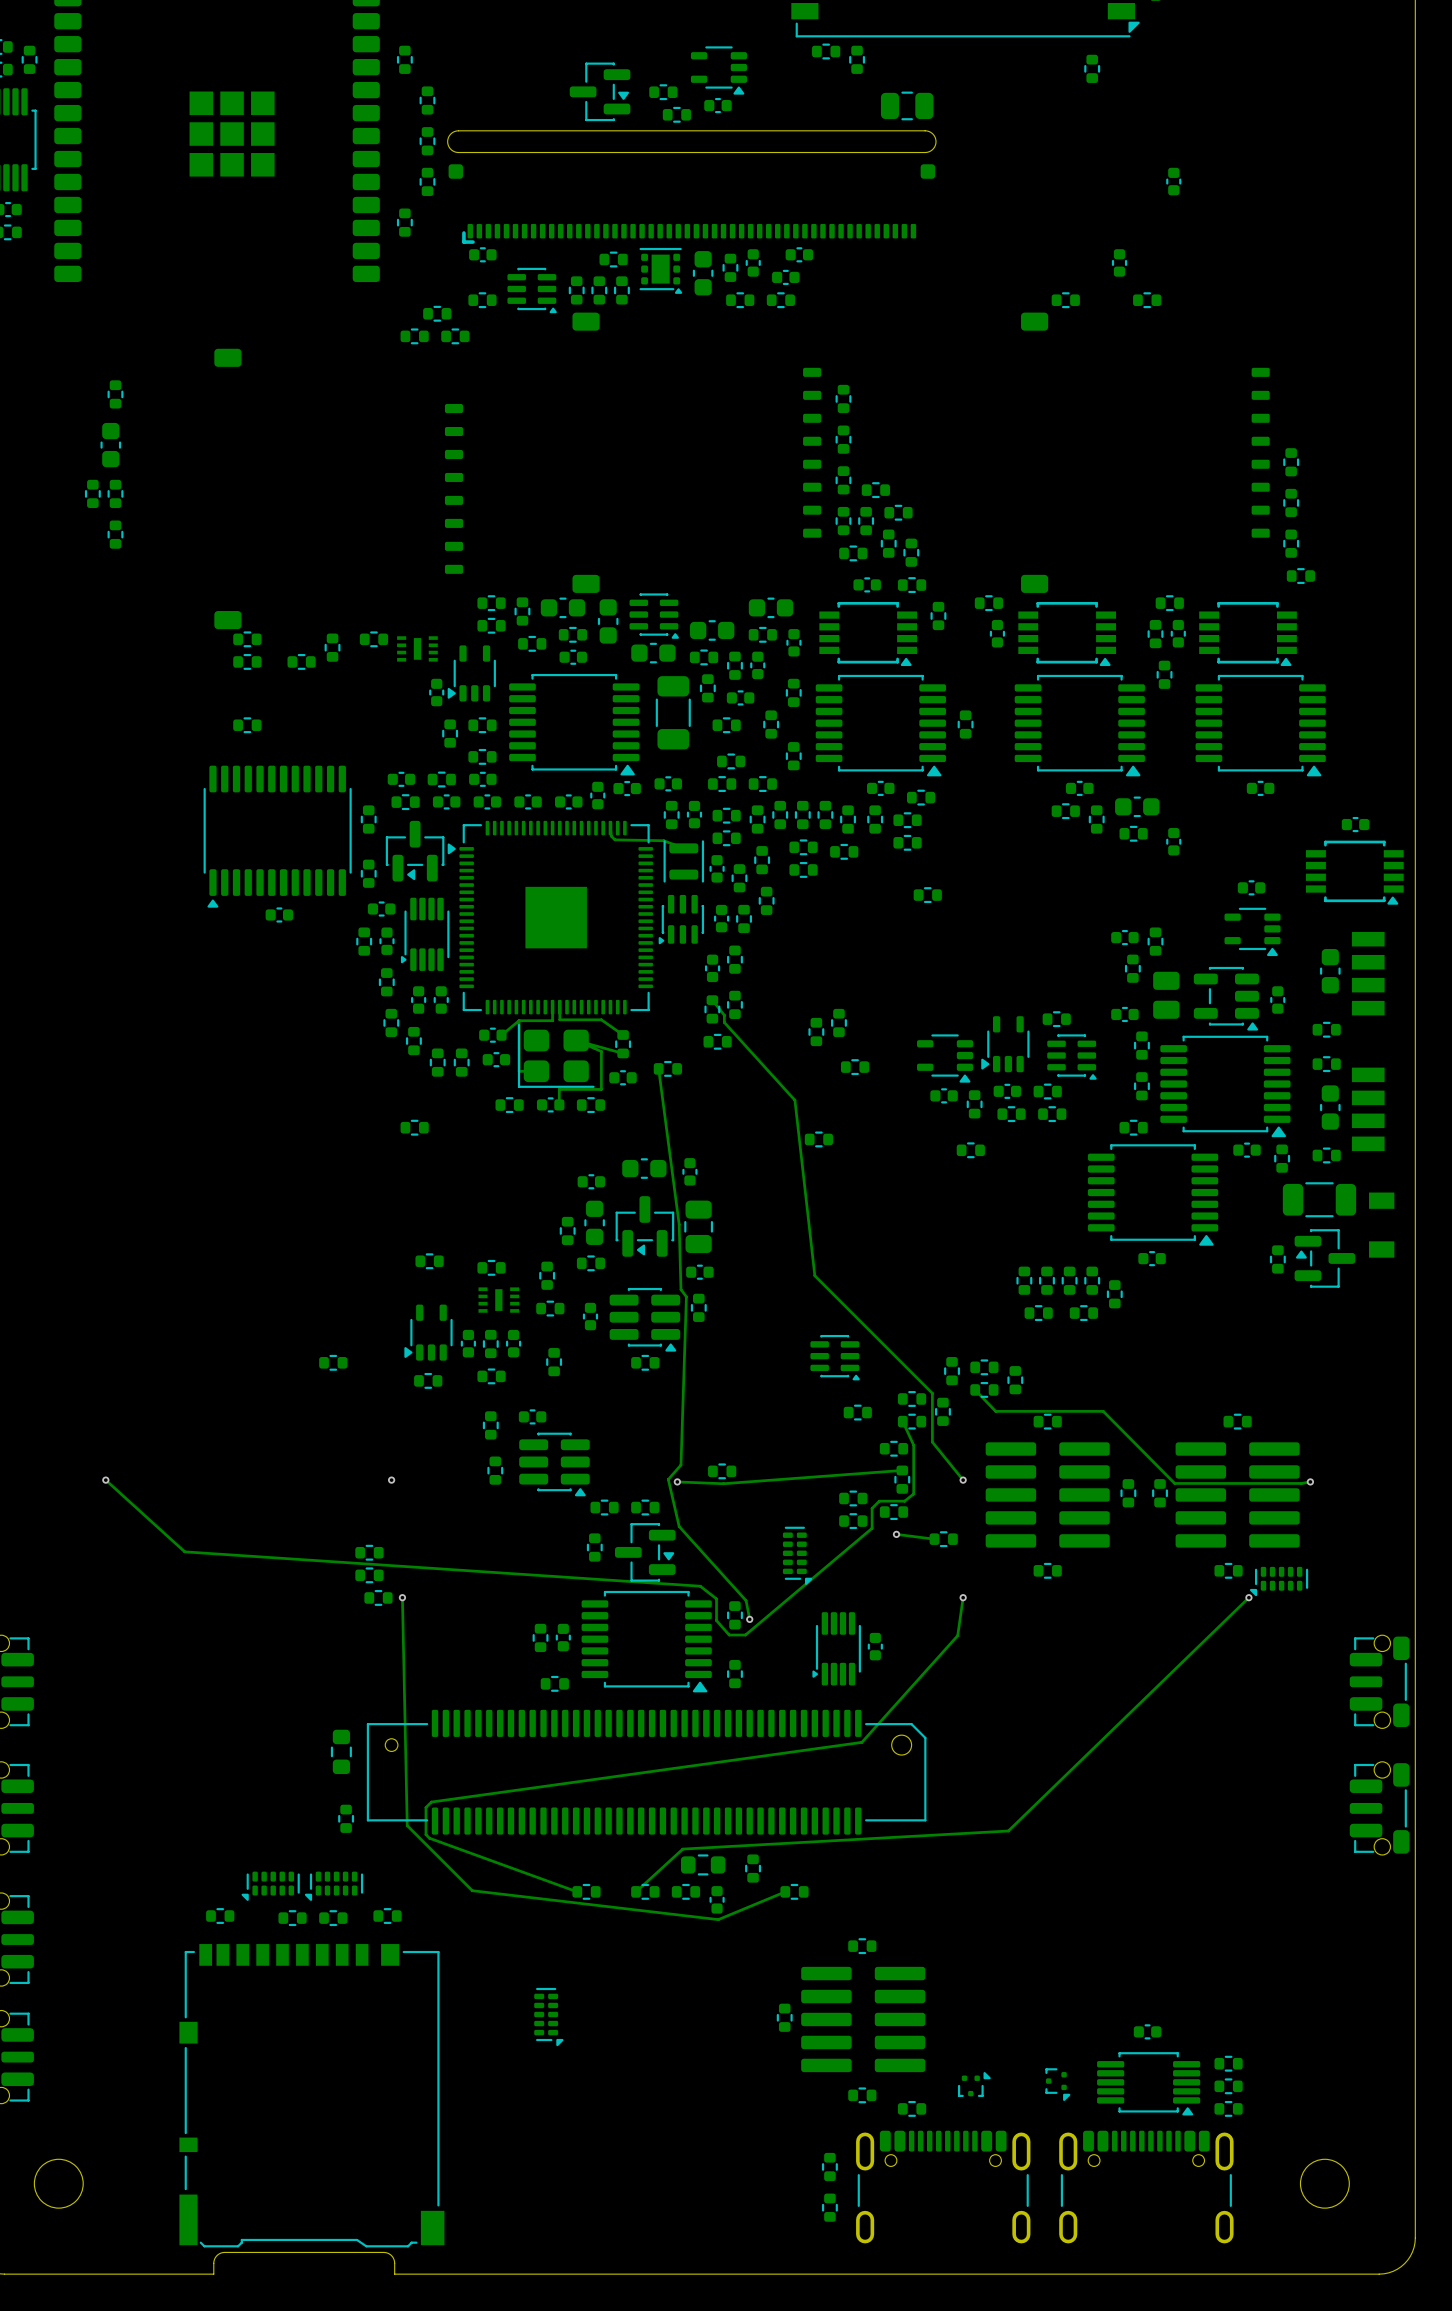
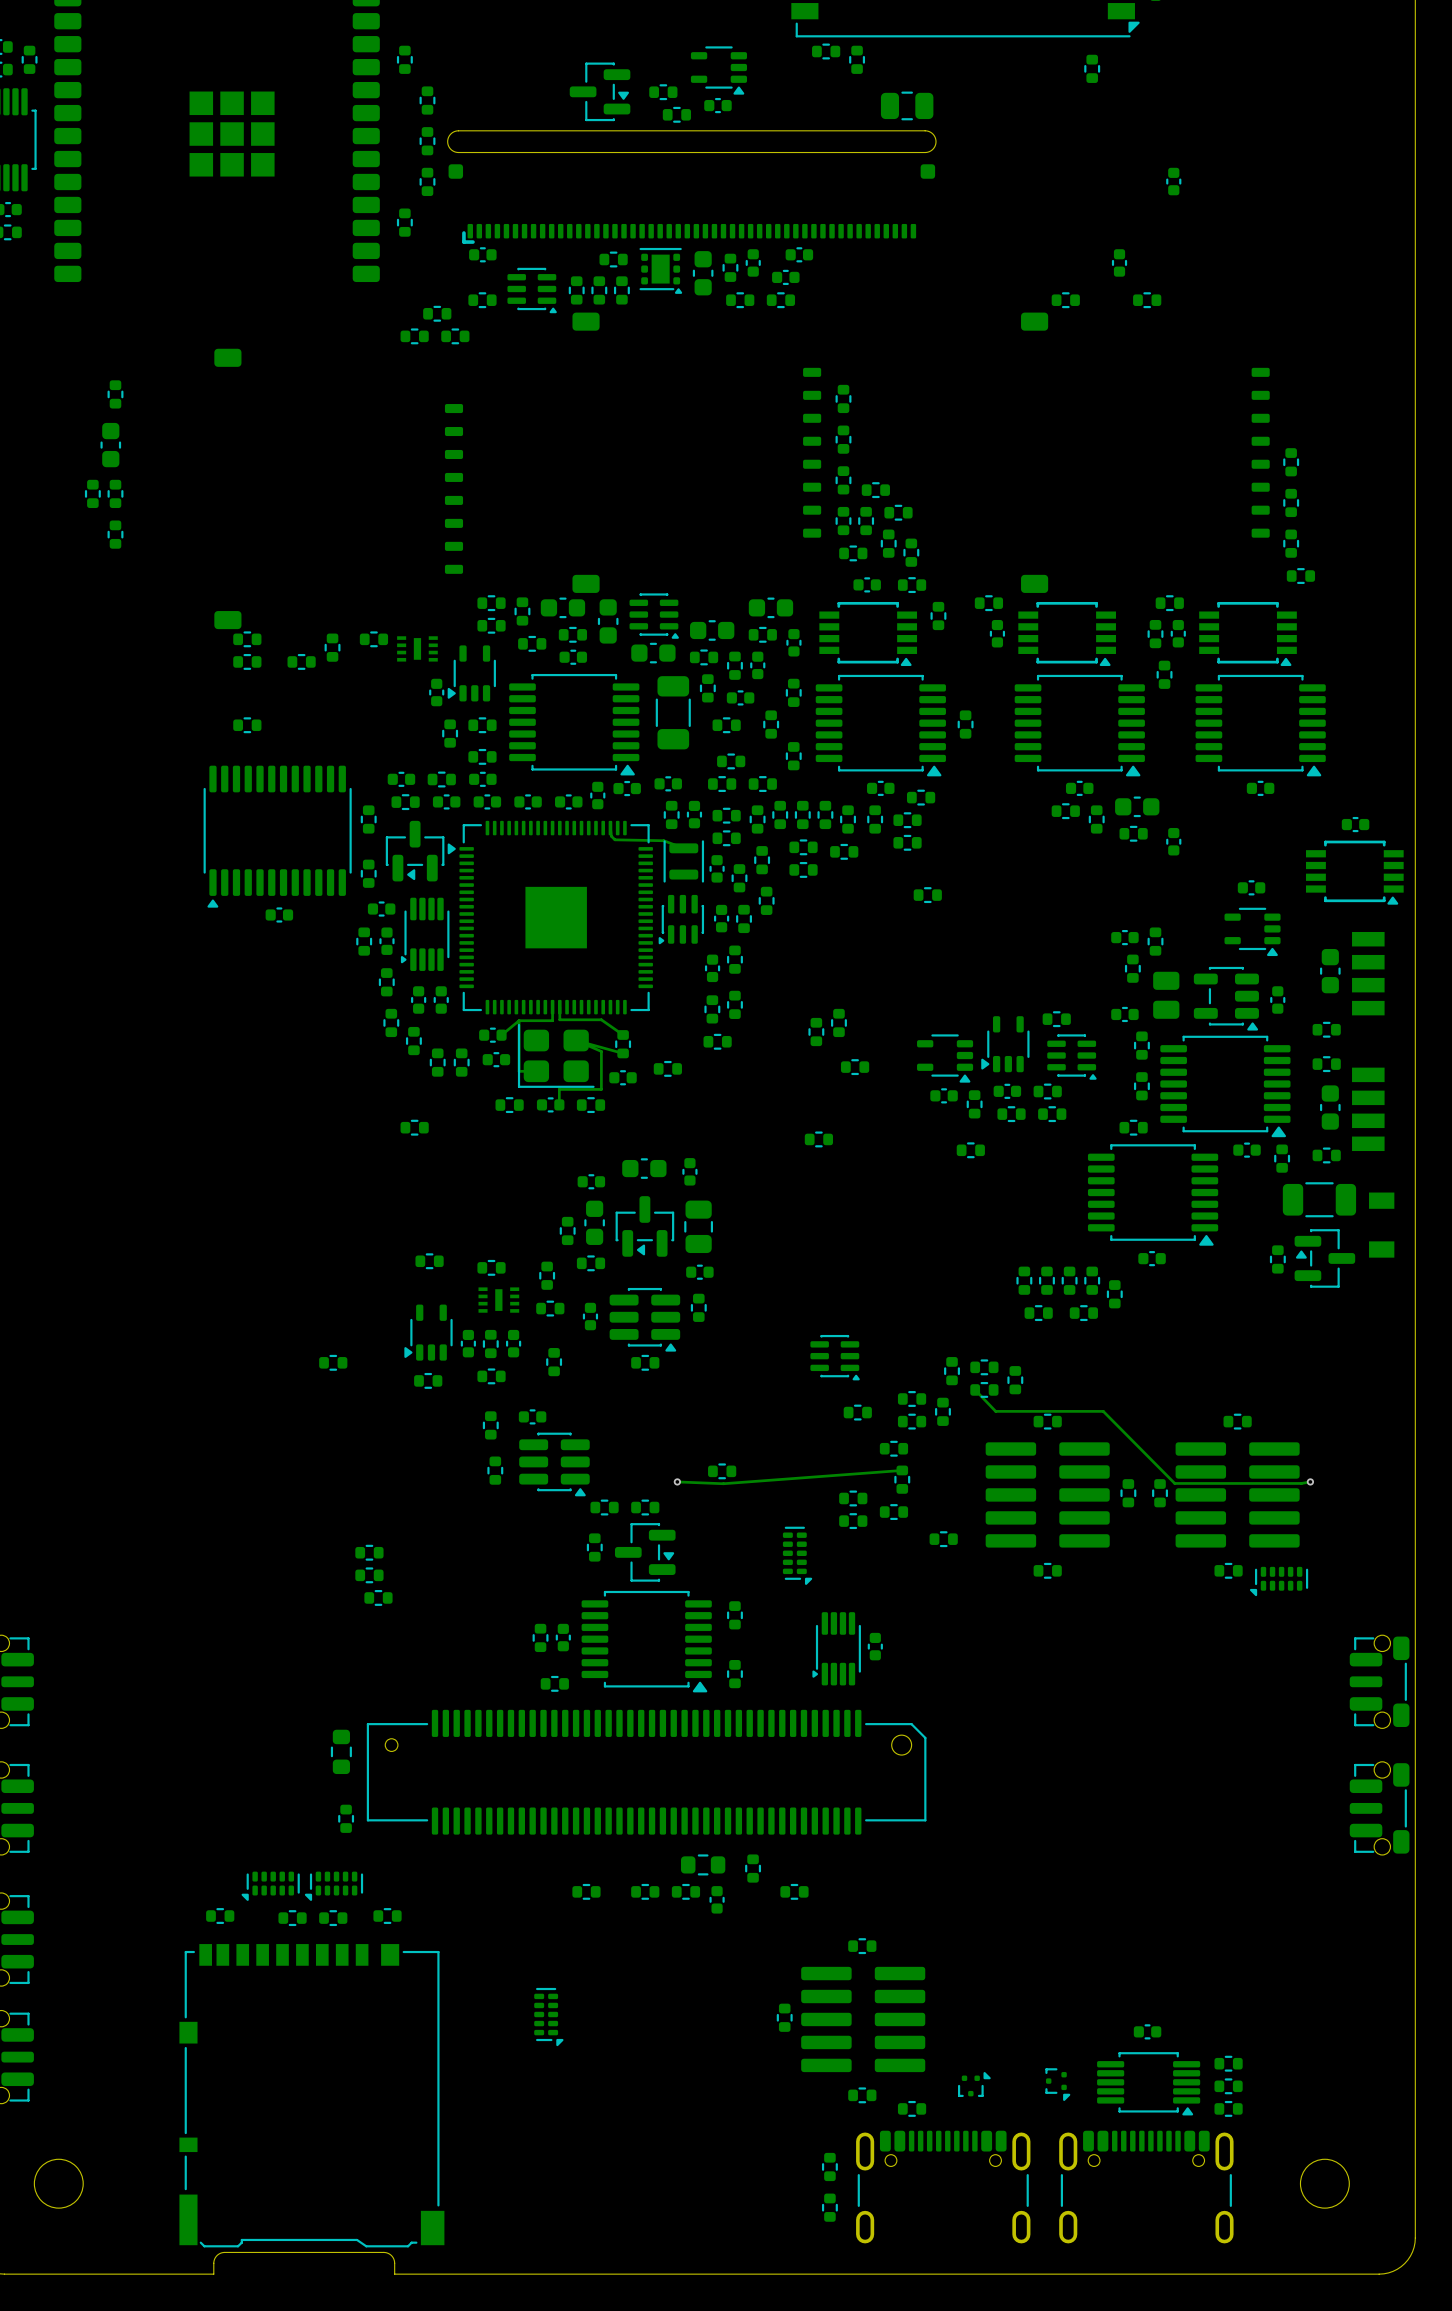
track: (712, 1000) (724, 1015) (724, 1022) (794, 1100) (814, 1275) (932, 1393) (932, 1442) (963, 1480) -> none
track: (658, 1068) (679, 1224) (680, 1289) (686, 1296) (680, 1465) (668, 1479) (679, 1526) (746, 1600) (749, 1619) -> none
track: (902, 1421) (913, 1445) (913, 1493) (904, 1501) (879, 1501) (872, 1508) (872, 1528) (745, 1635) (729, 1635) (716, 1620) (716, 1598) (700, 1586) (184, 1551) (105, 1480) -> none
via: (105, 1480) -> none
via: (391, 1480) -> none
via: (963, 1480) -> none
track: (896, 1534) (934, 1539) -> none
via: (896, 1534) -> none
track: (402, 1597) (407, 1825) (472, 1890) (718, 1919) (785, 1891) -> none
via: (402, 1597) -> none
track: (963, 1597) (957, 1635) (861, 1742) (431, 1802) (425, 1807) (425, 1834) (429, 1838) (577, 1891) -> none
via: (963, 1597) -> none
track: (1248, 1597) (1008, 1831) (682, 1849) (636, 1891) -> none
via: (1248, 1597) -> none
via: (749, 1619) -> none

